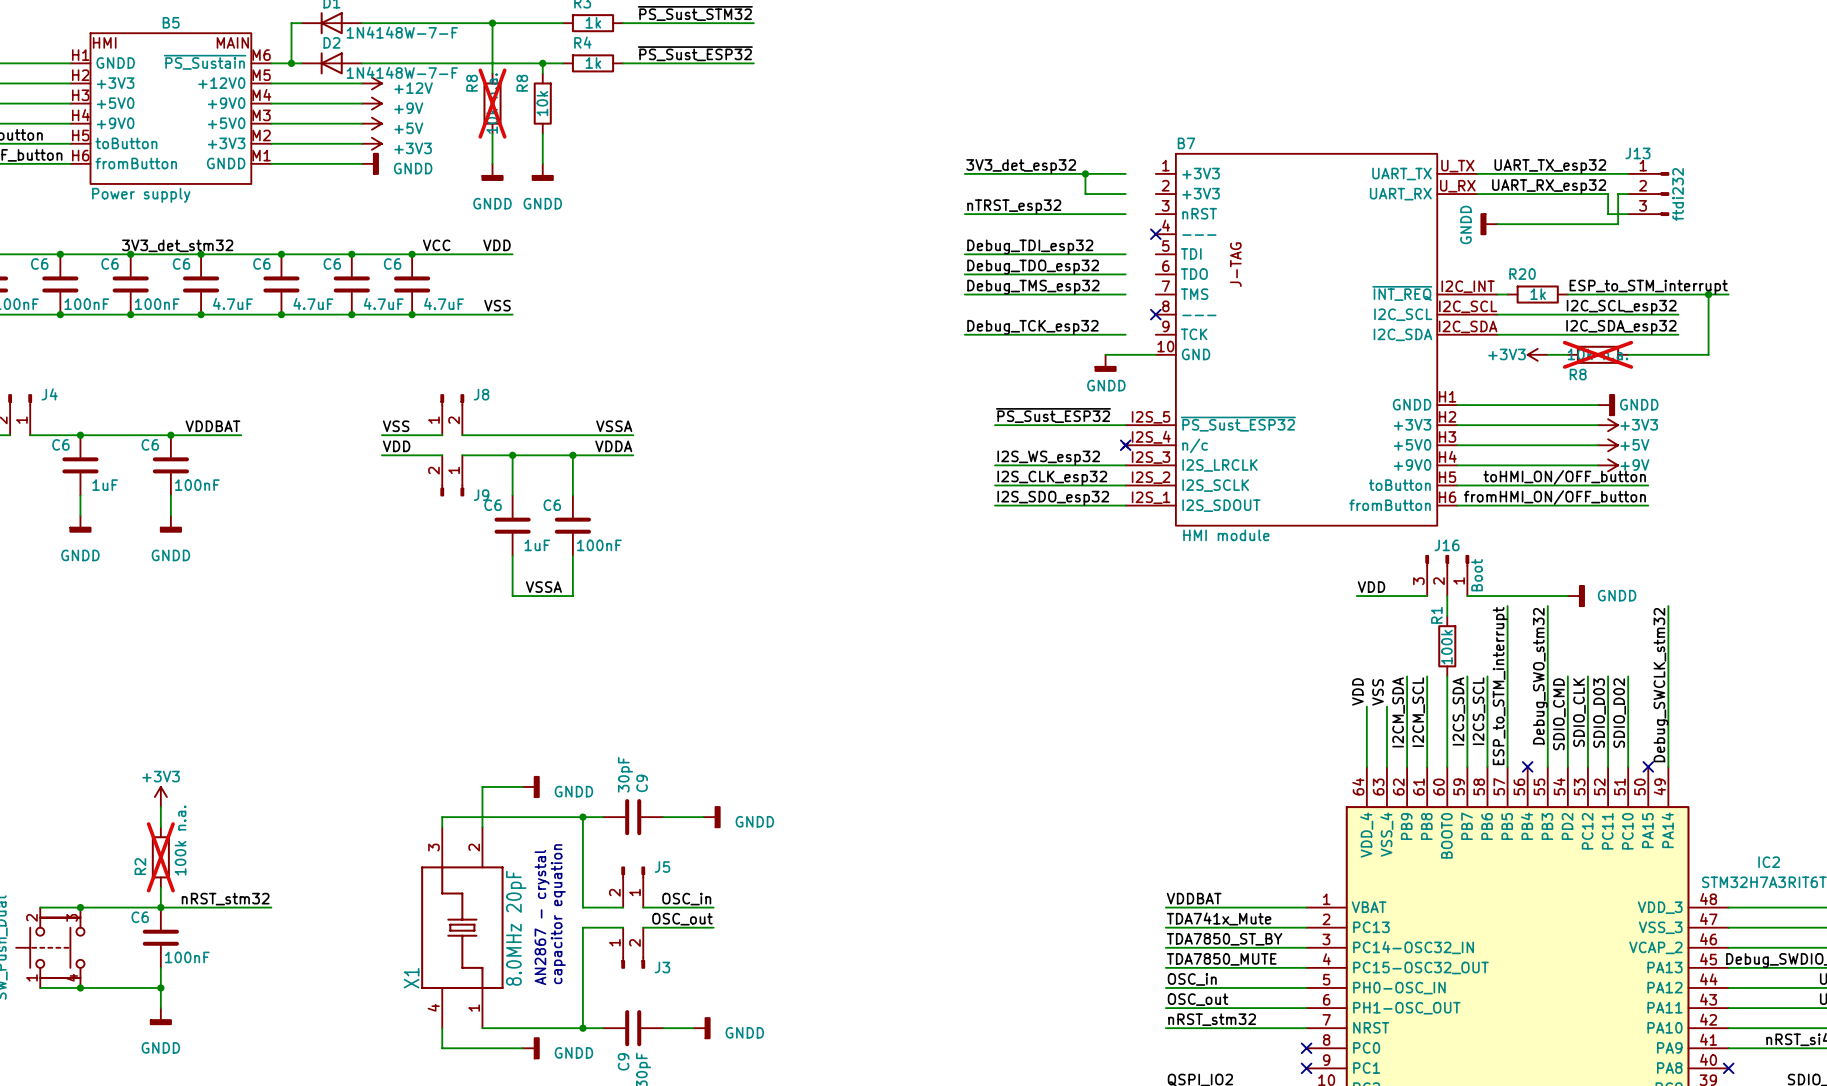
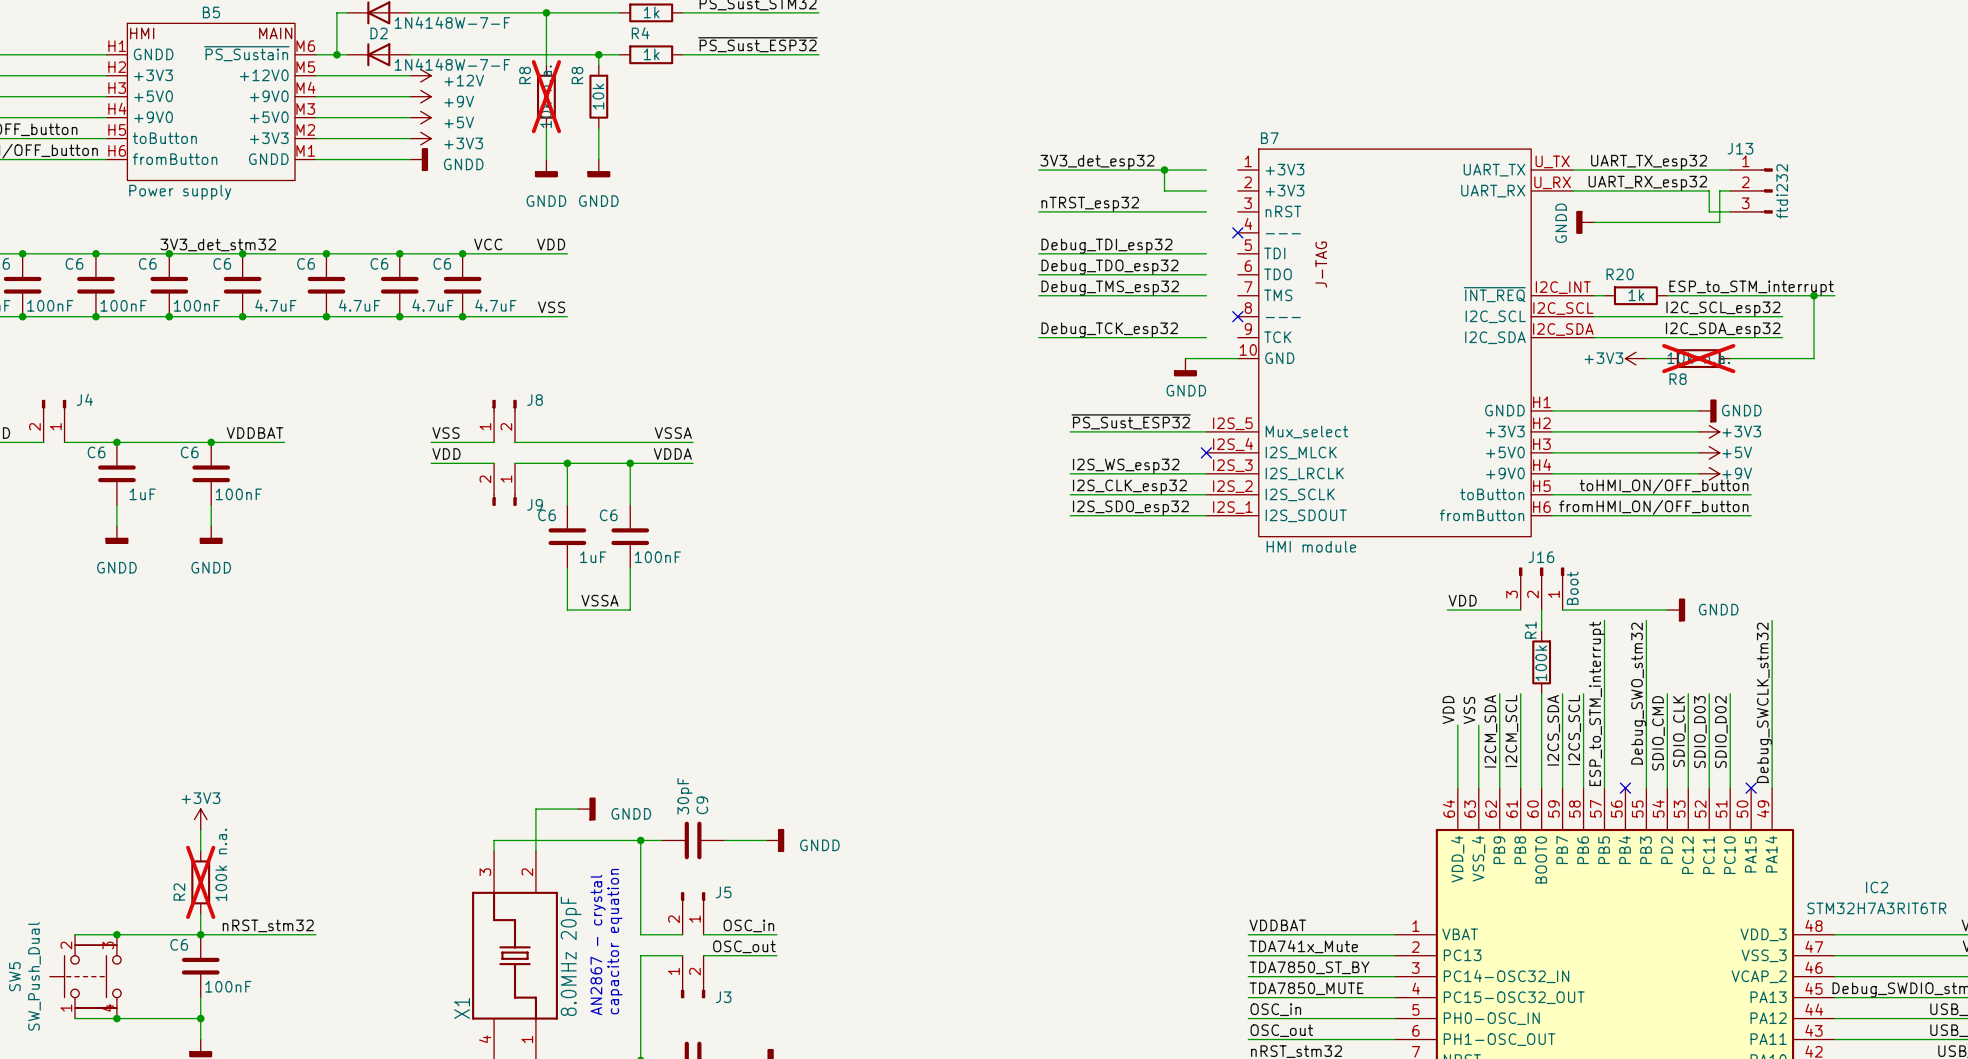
B7 symbol: [1123, 153, 1498, 526] -> [1206, 149, 1595, 537]

